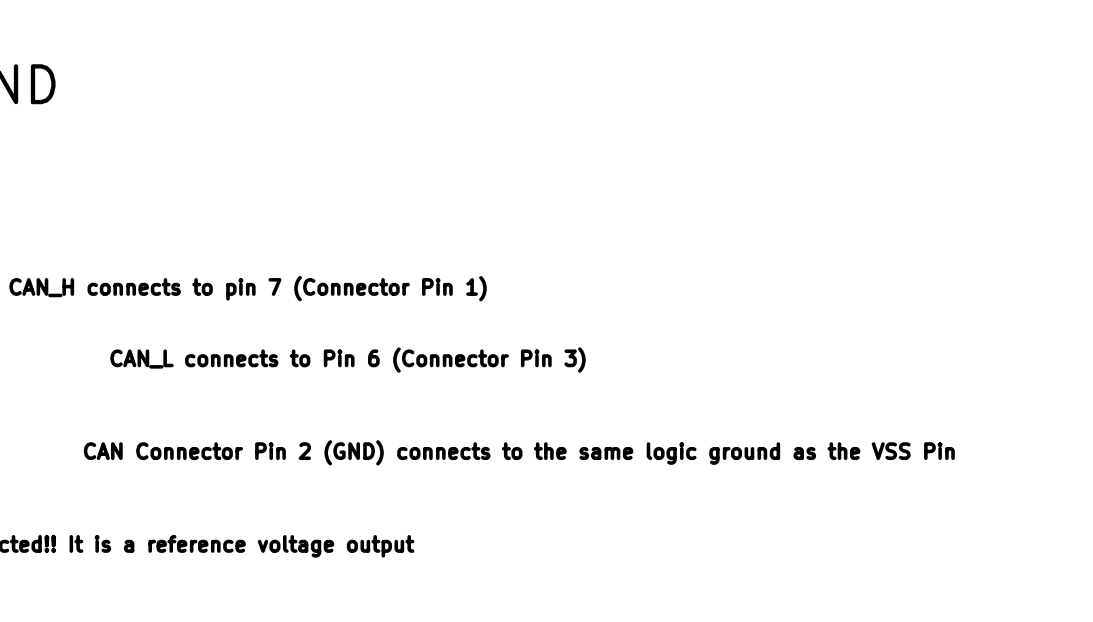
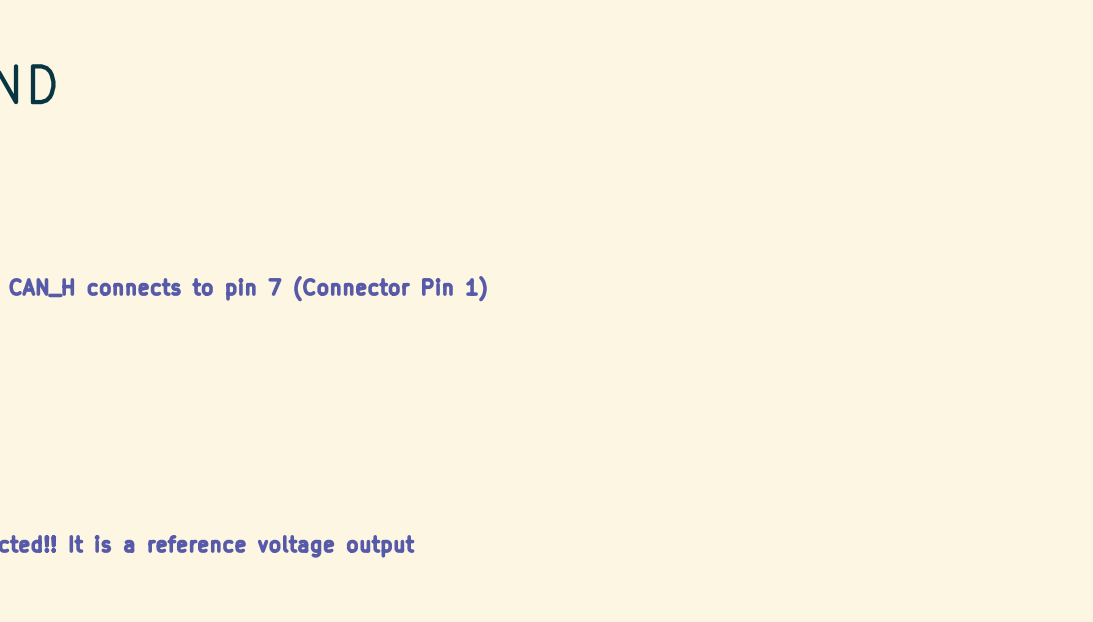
text: CAN_L connects to Pin 6 (Connector Pin 3) (348, 360) -> none
text: CAN Connector Pin 2 (GND) connects to the same logic ground as the VSS Pin (519, 452) -> none

